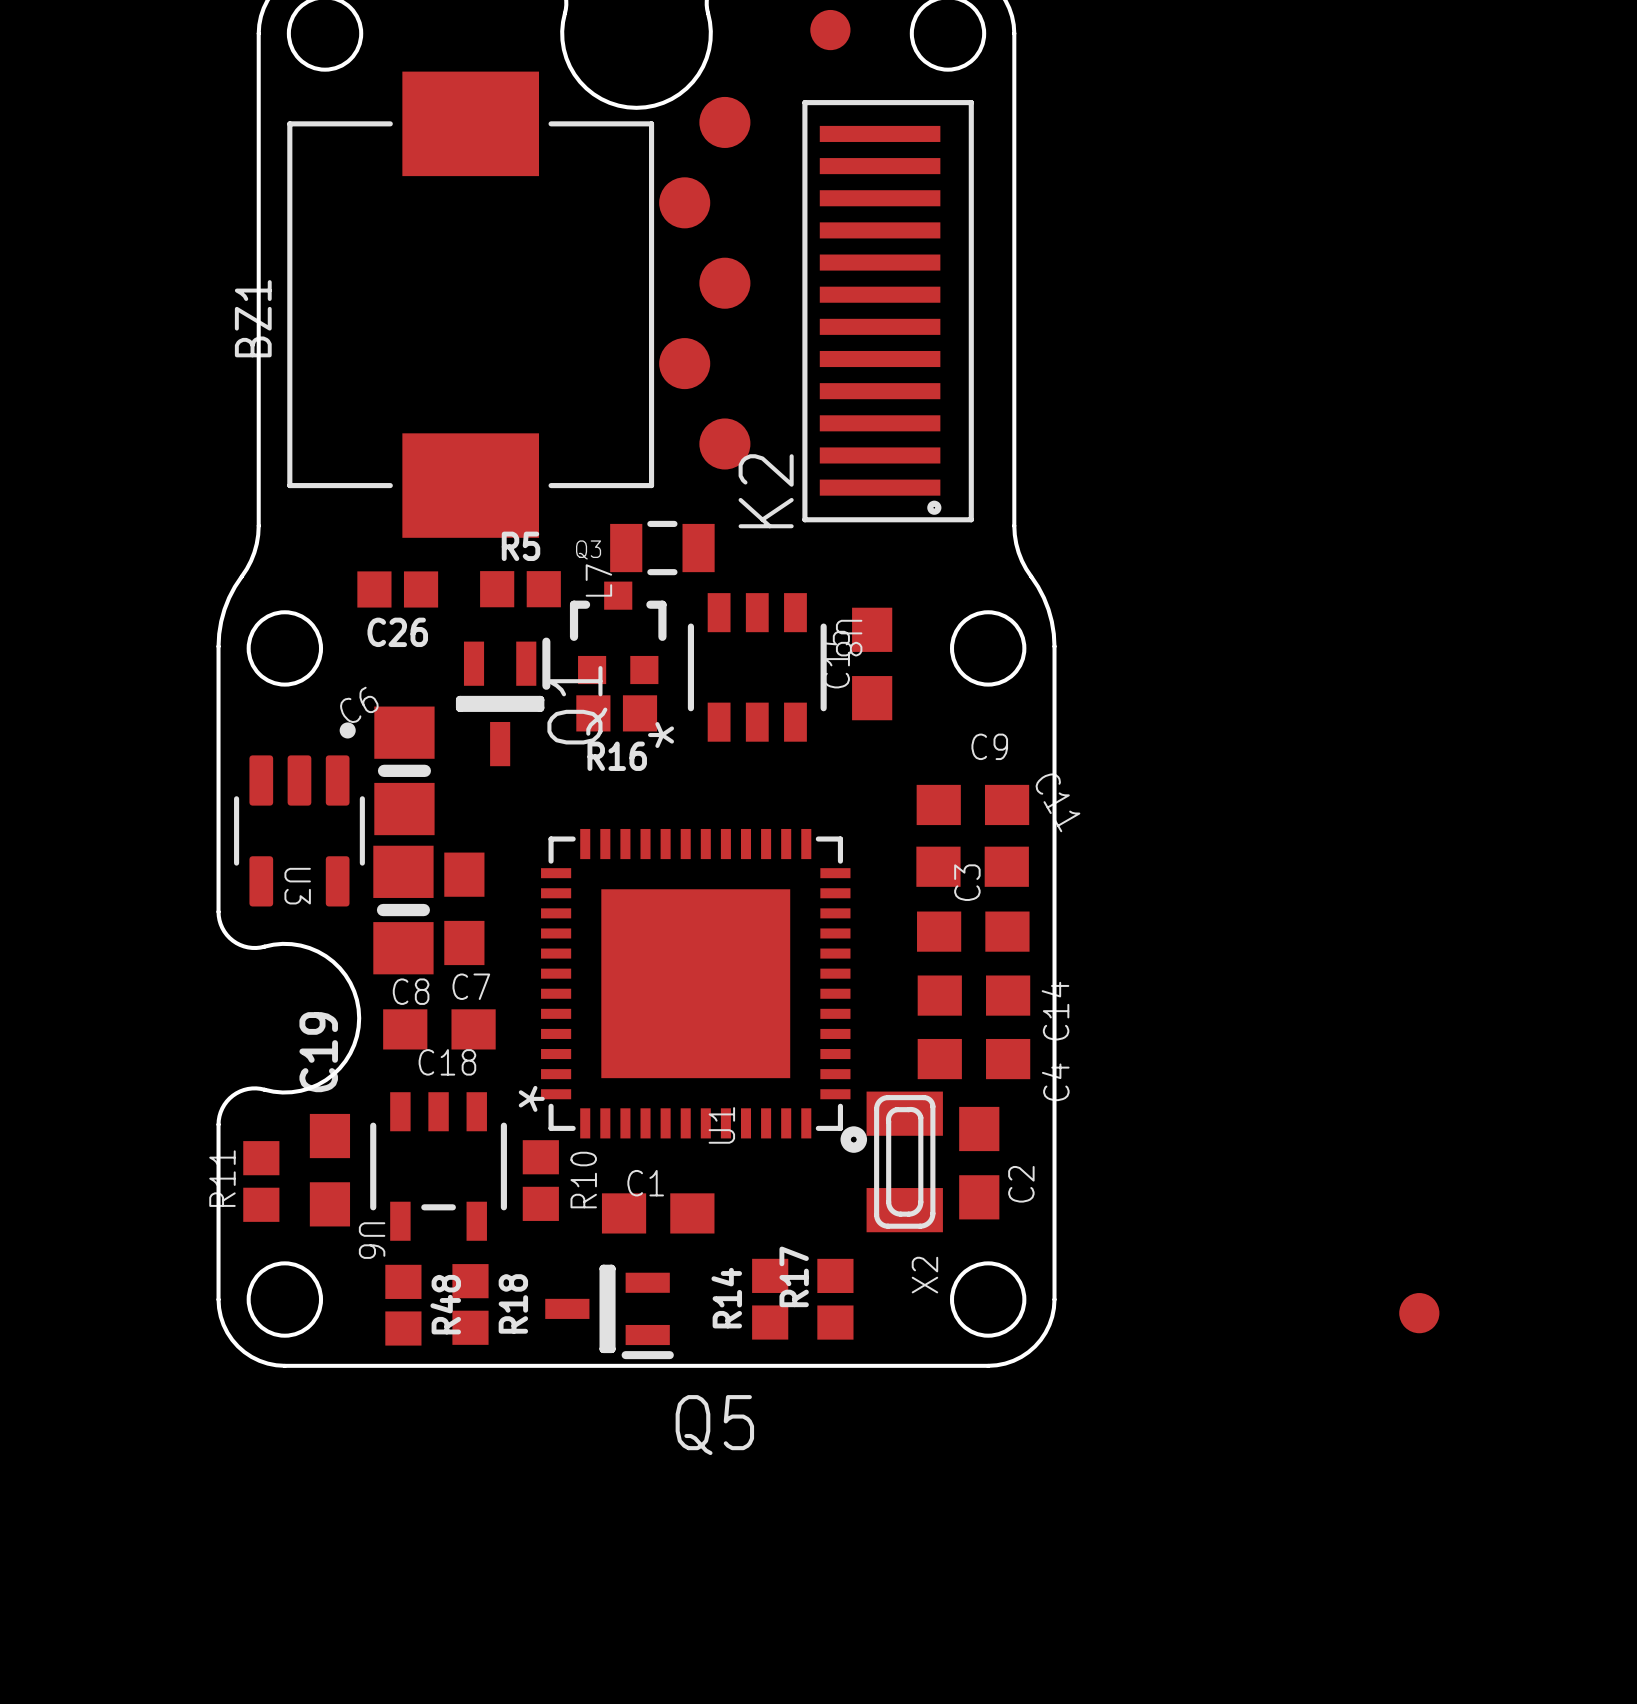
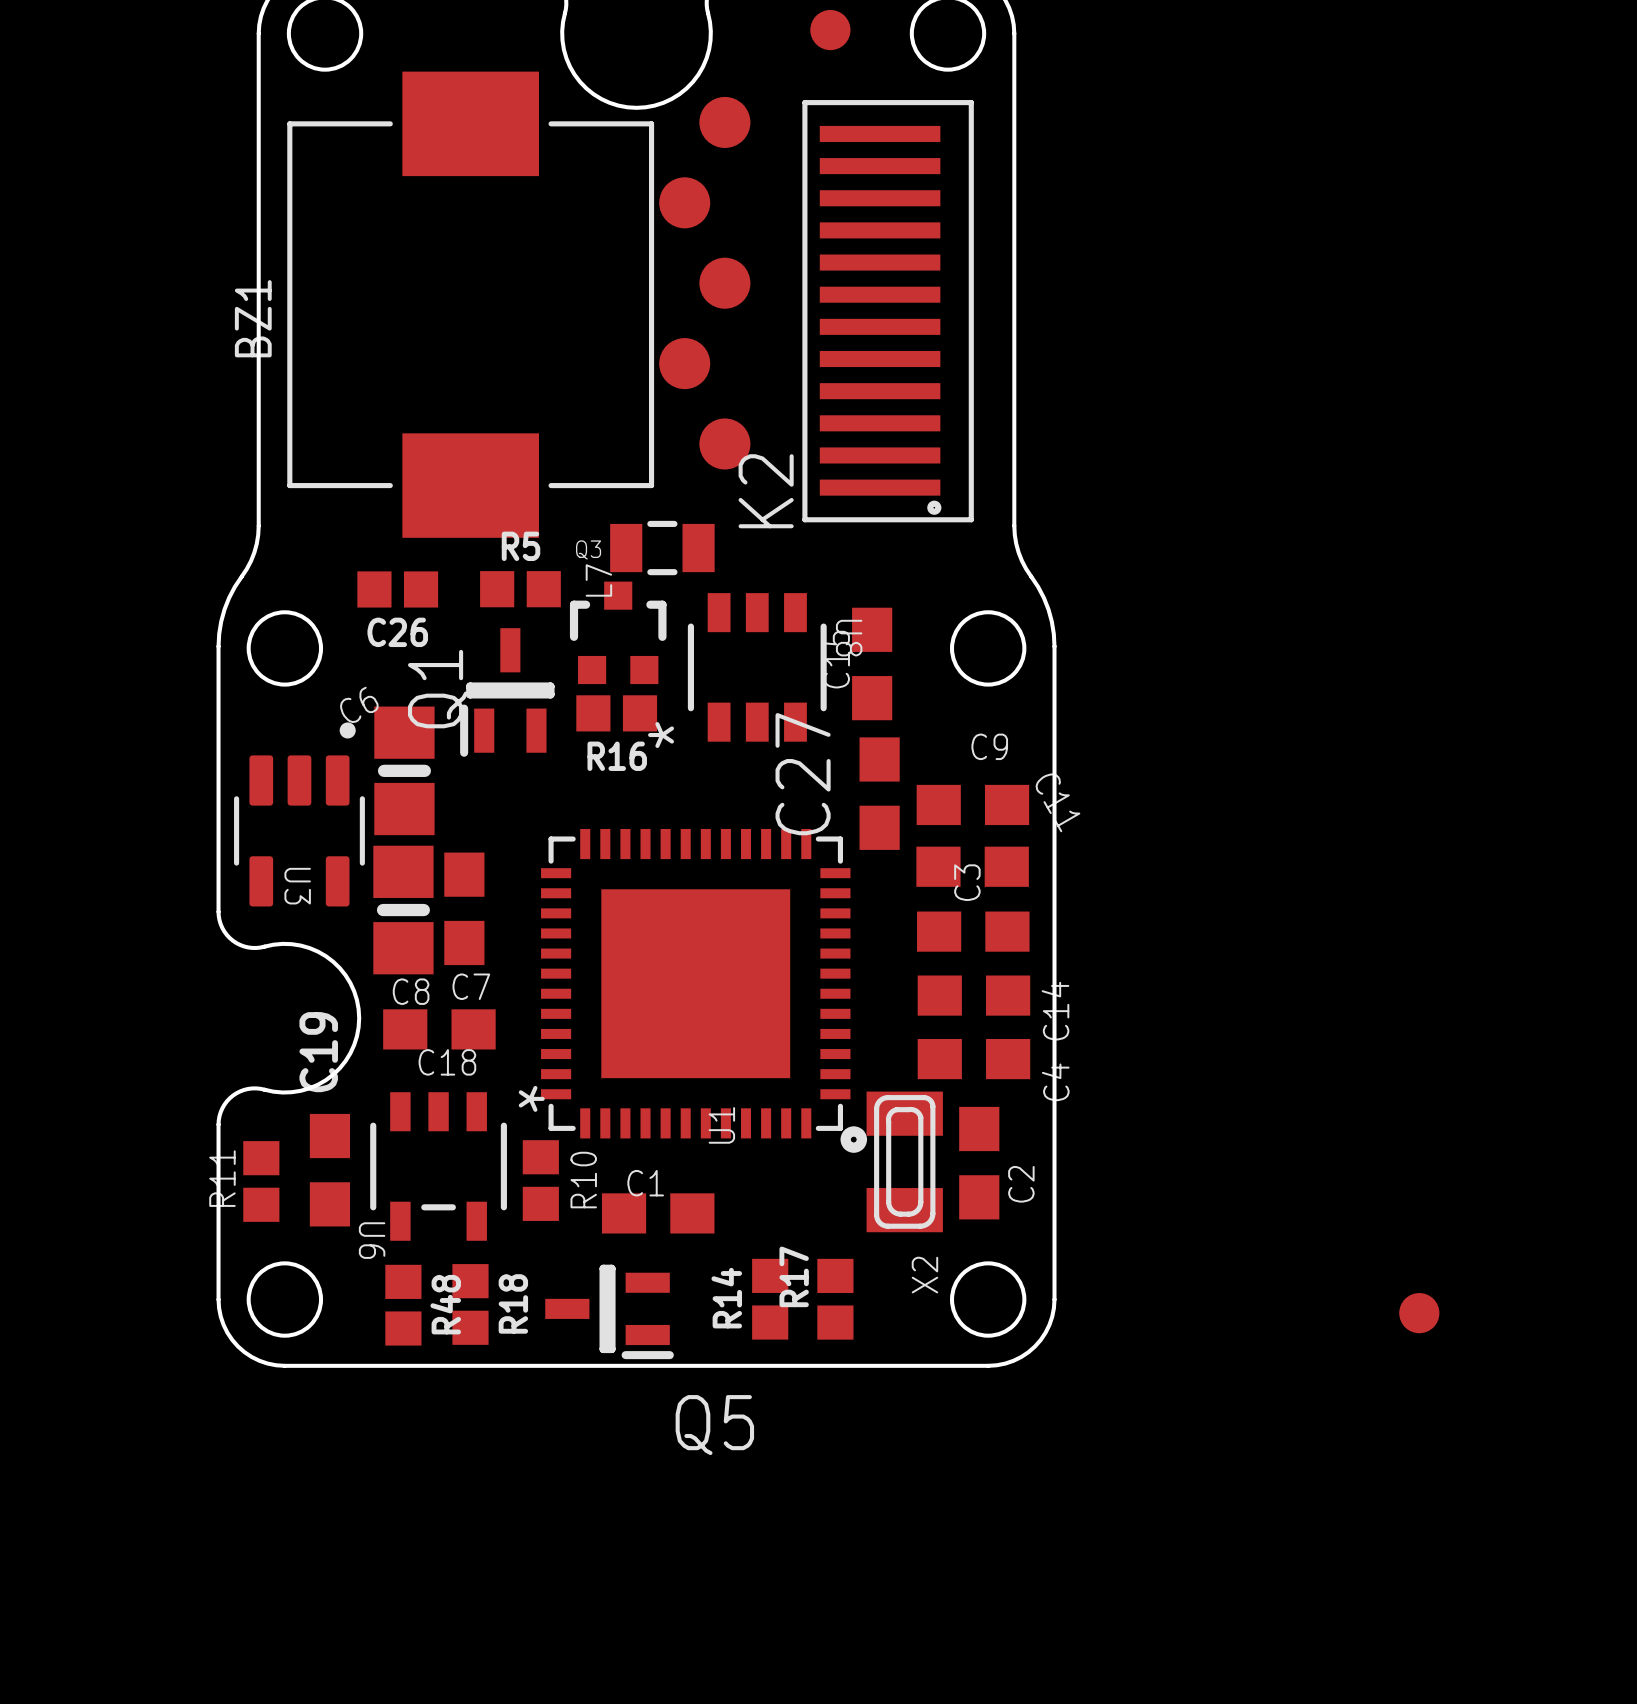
Q1 rotation: 0° (503, 701) -> 180° (507, 692)
C27: none -> (879, 793)

